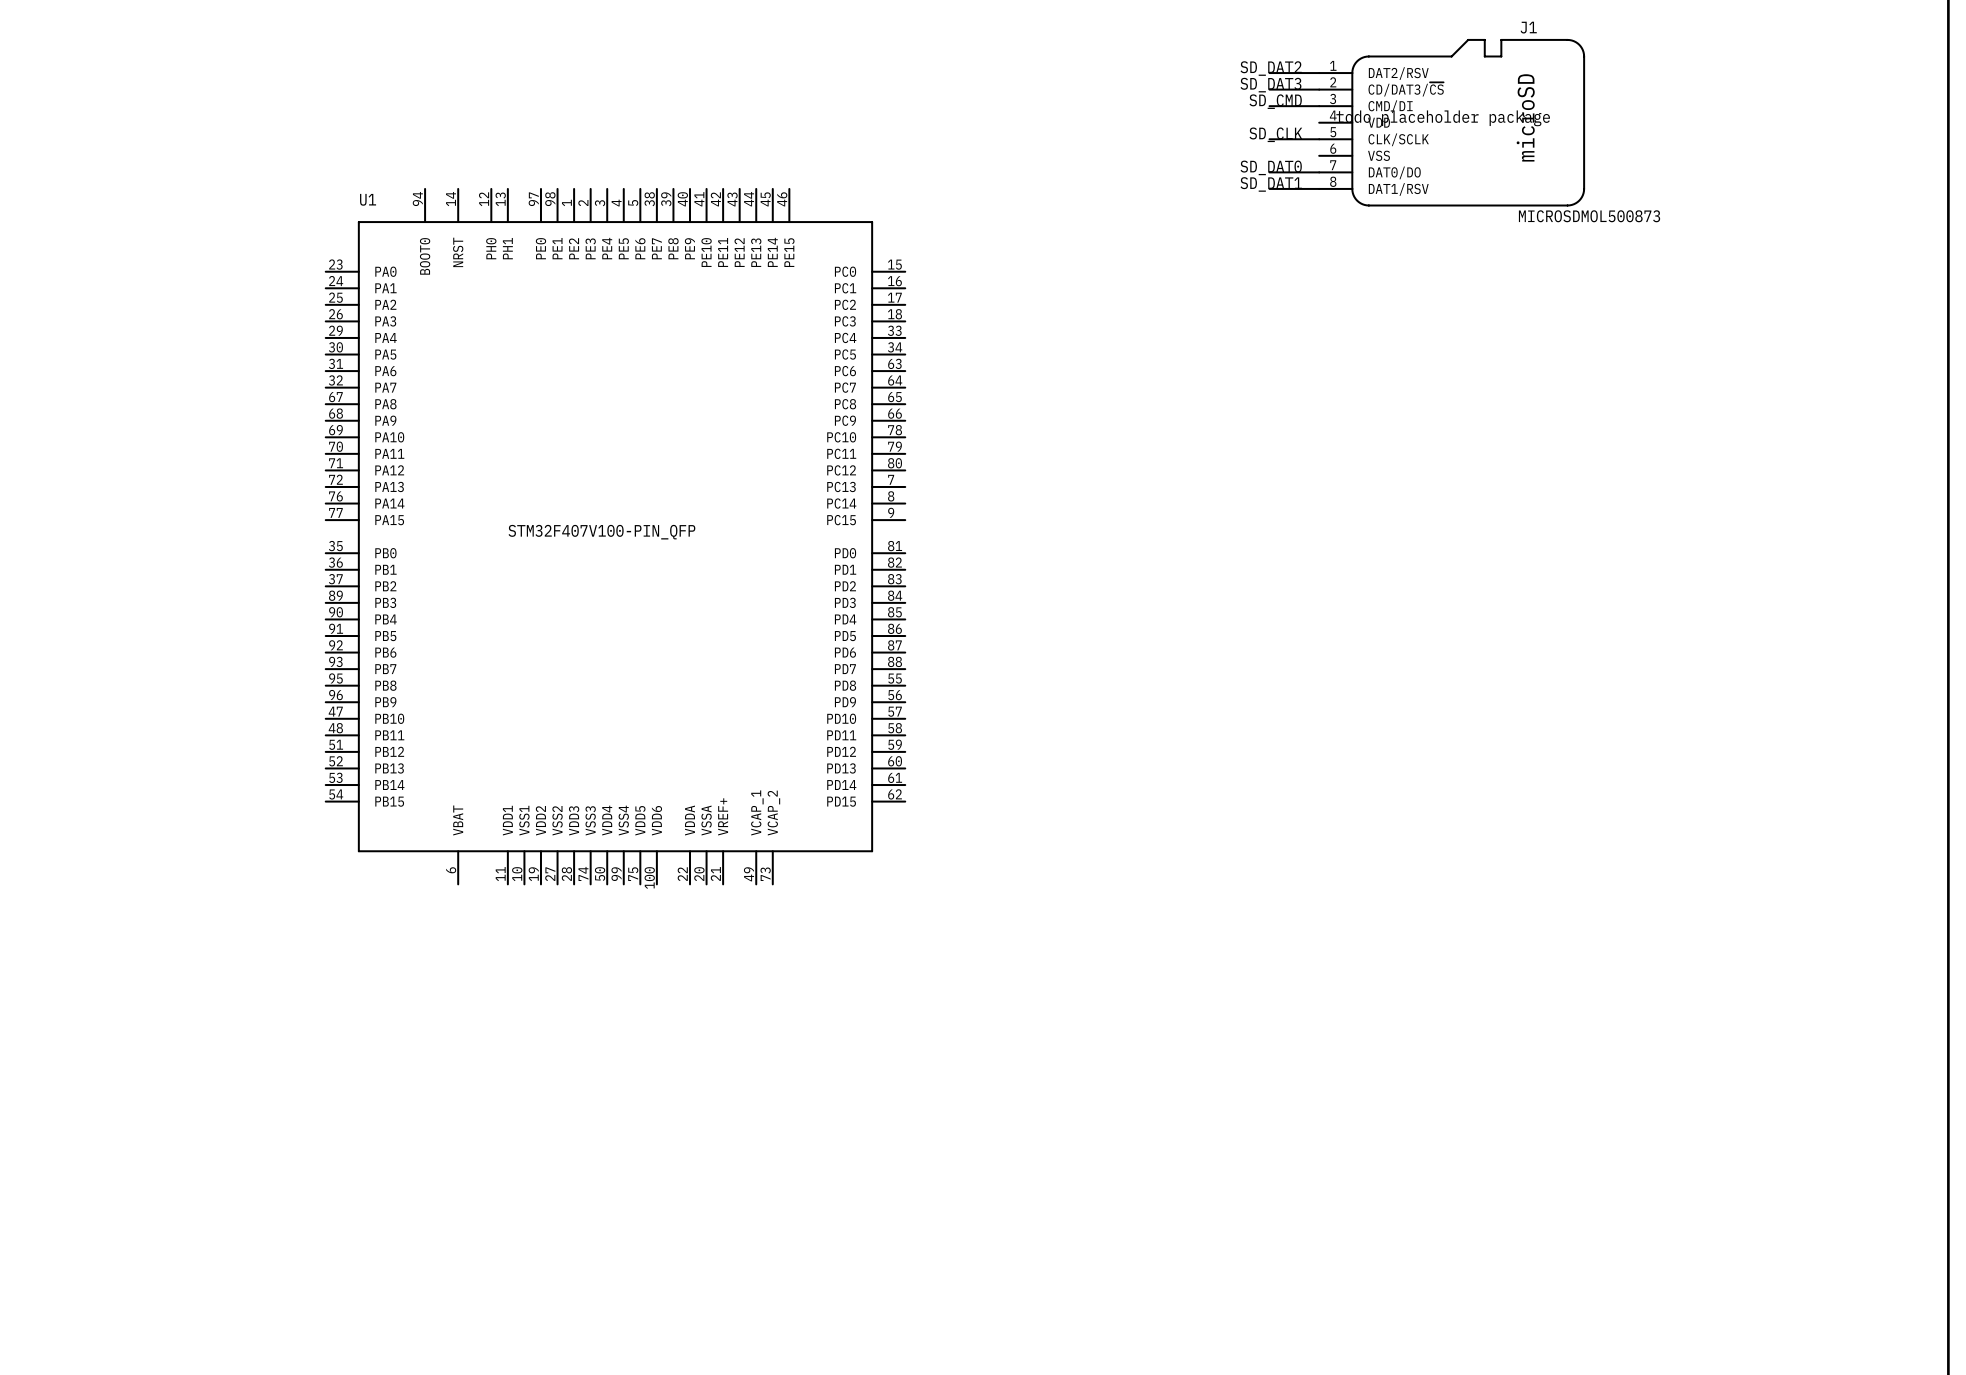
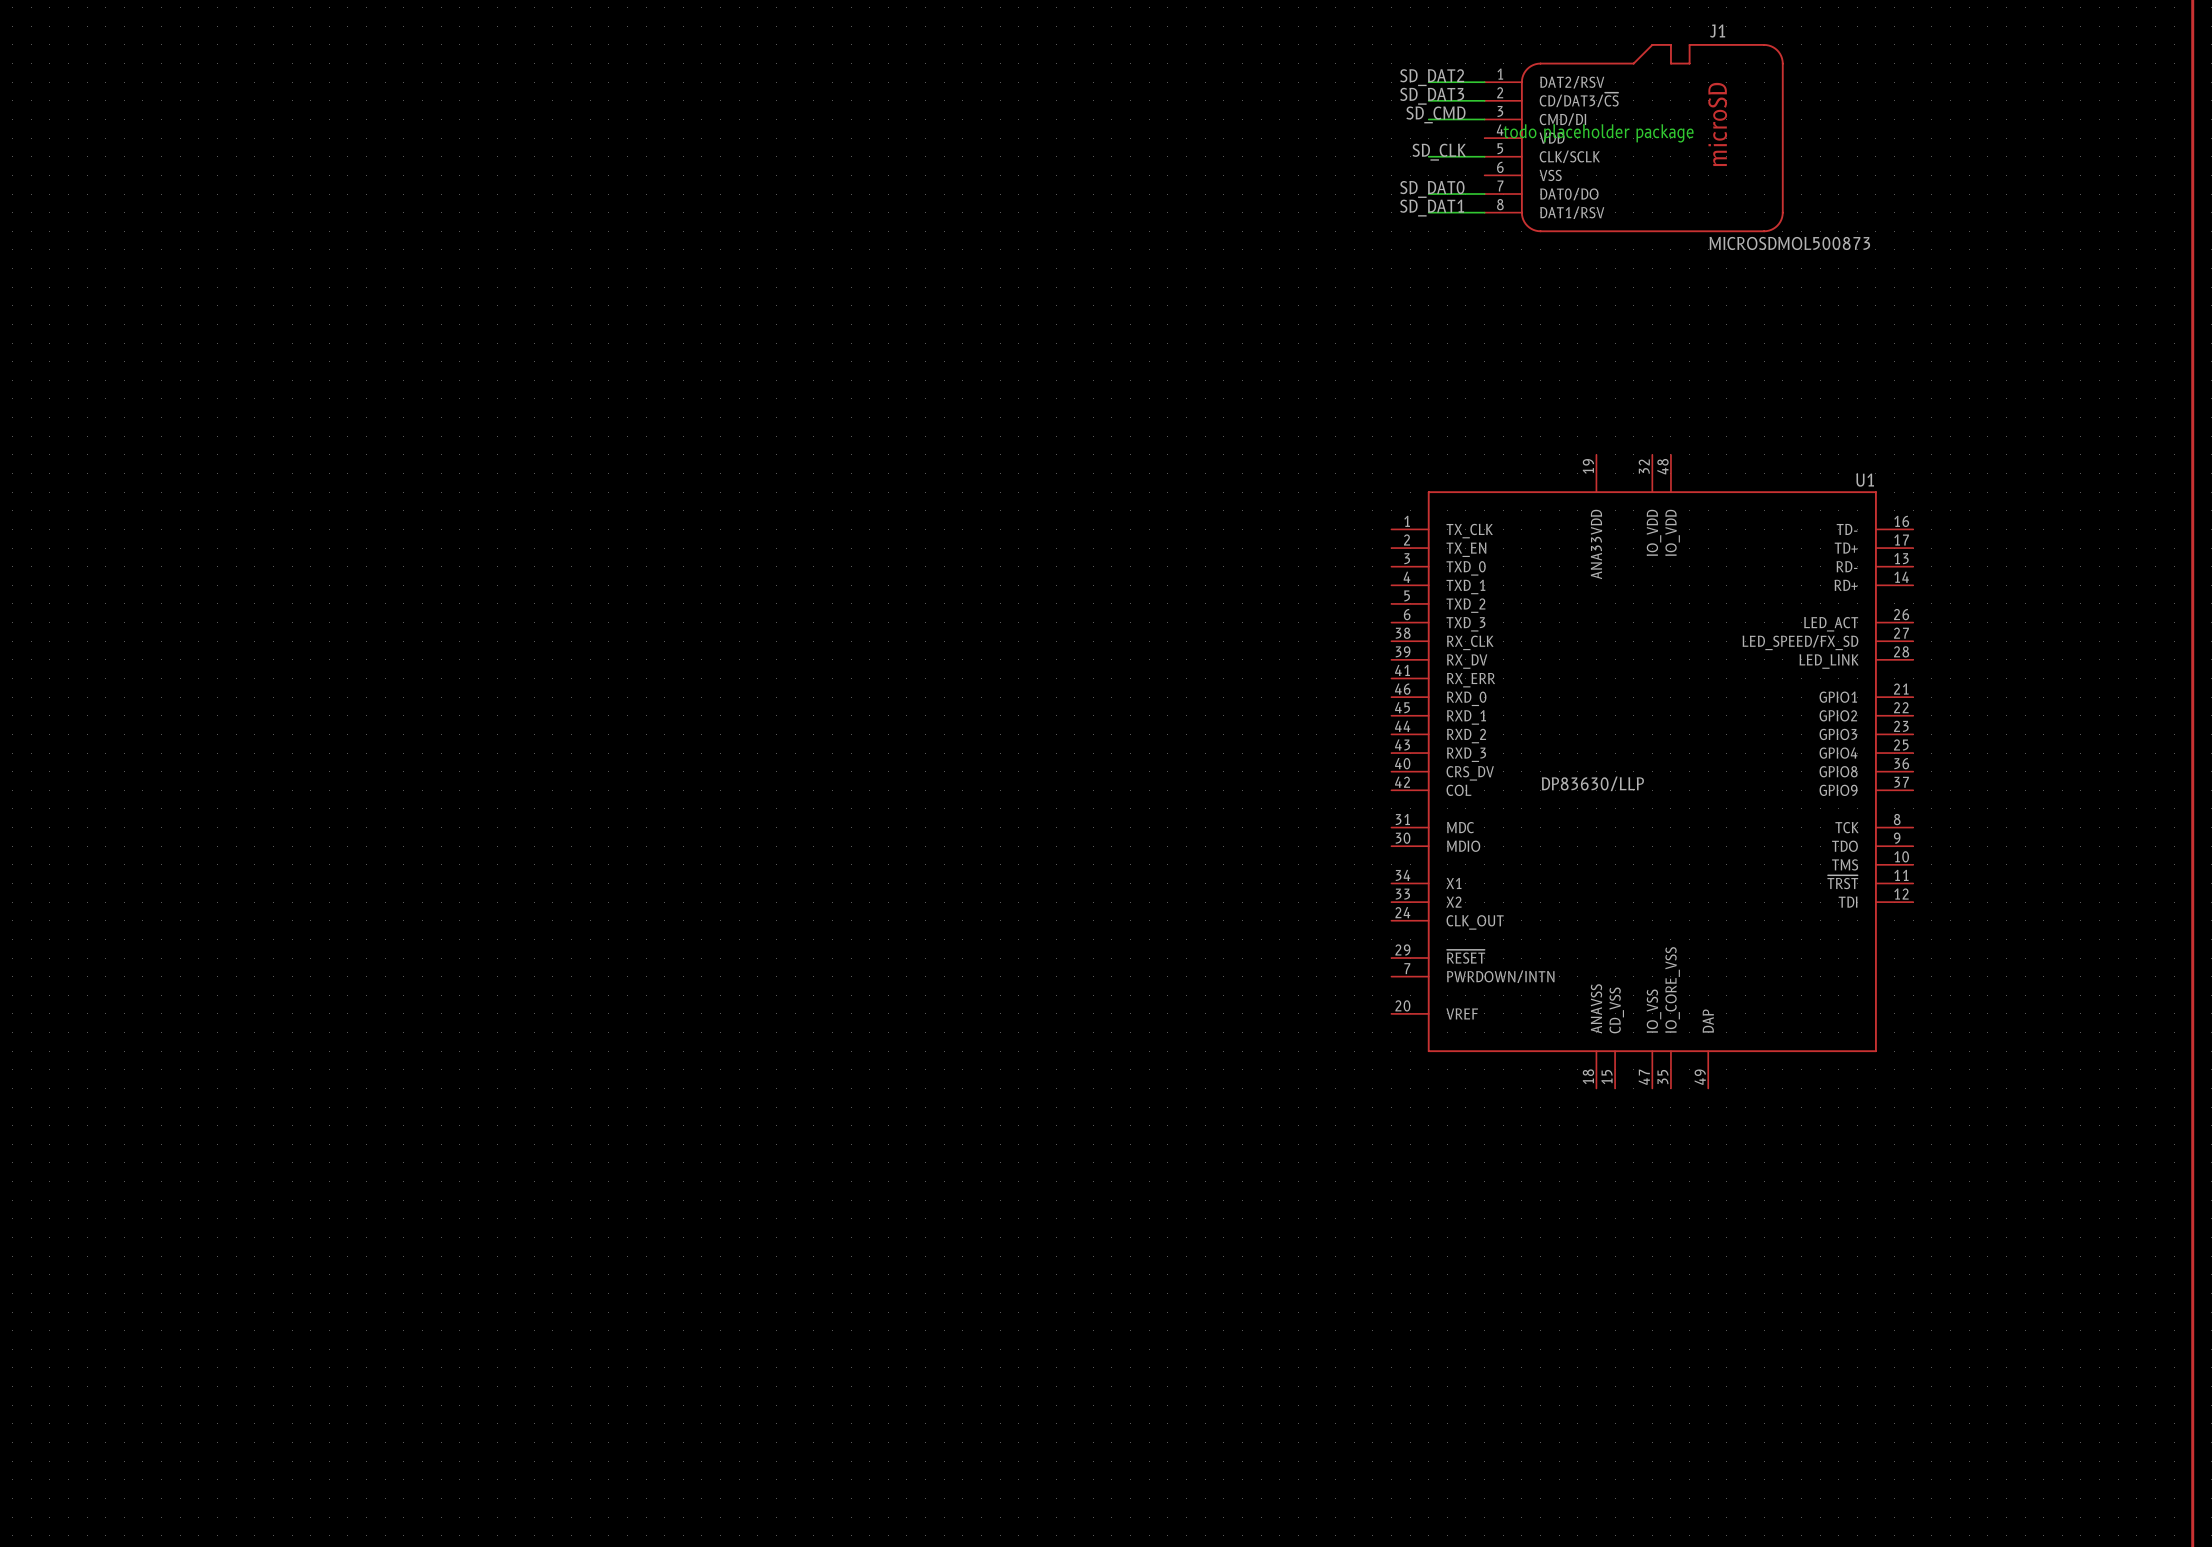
U1 symbol: [325, 188, 906, 885] -> [1391, 454, 1914, 1089]
U1 name position: U1 (368, 199) -> U1 (1865, 480)
U1 value: STM32F407V100-PIN_QFP (601, 532) -> DP83630/LLP (1592, 783)

